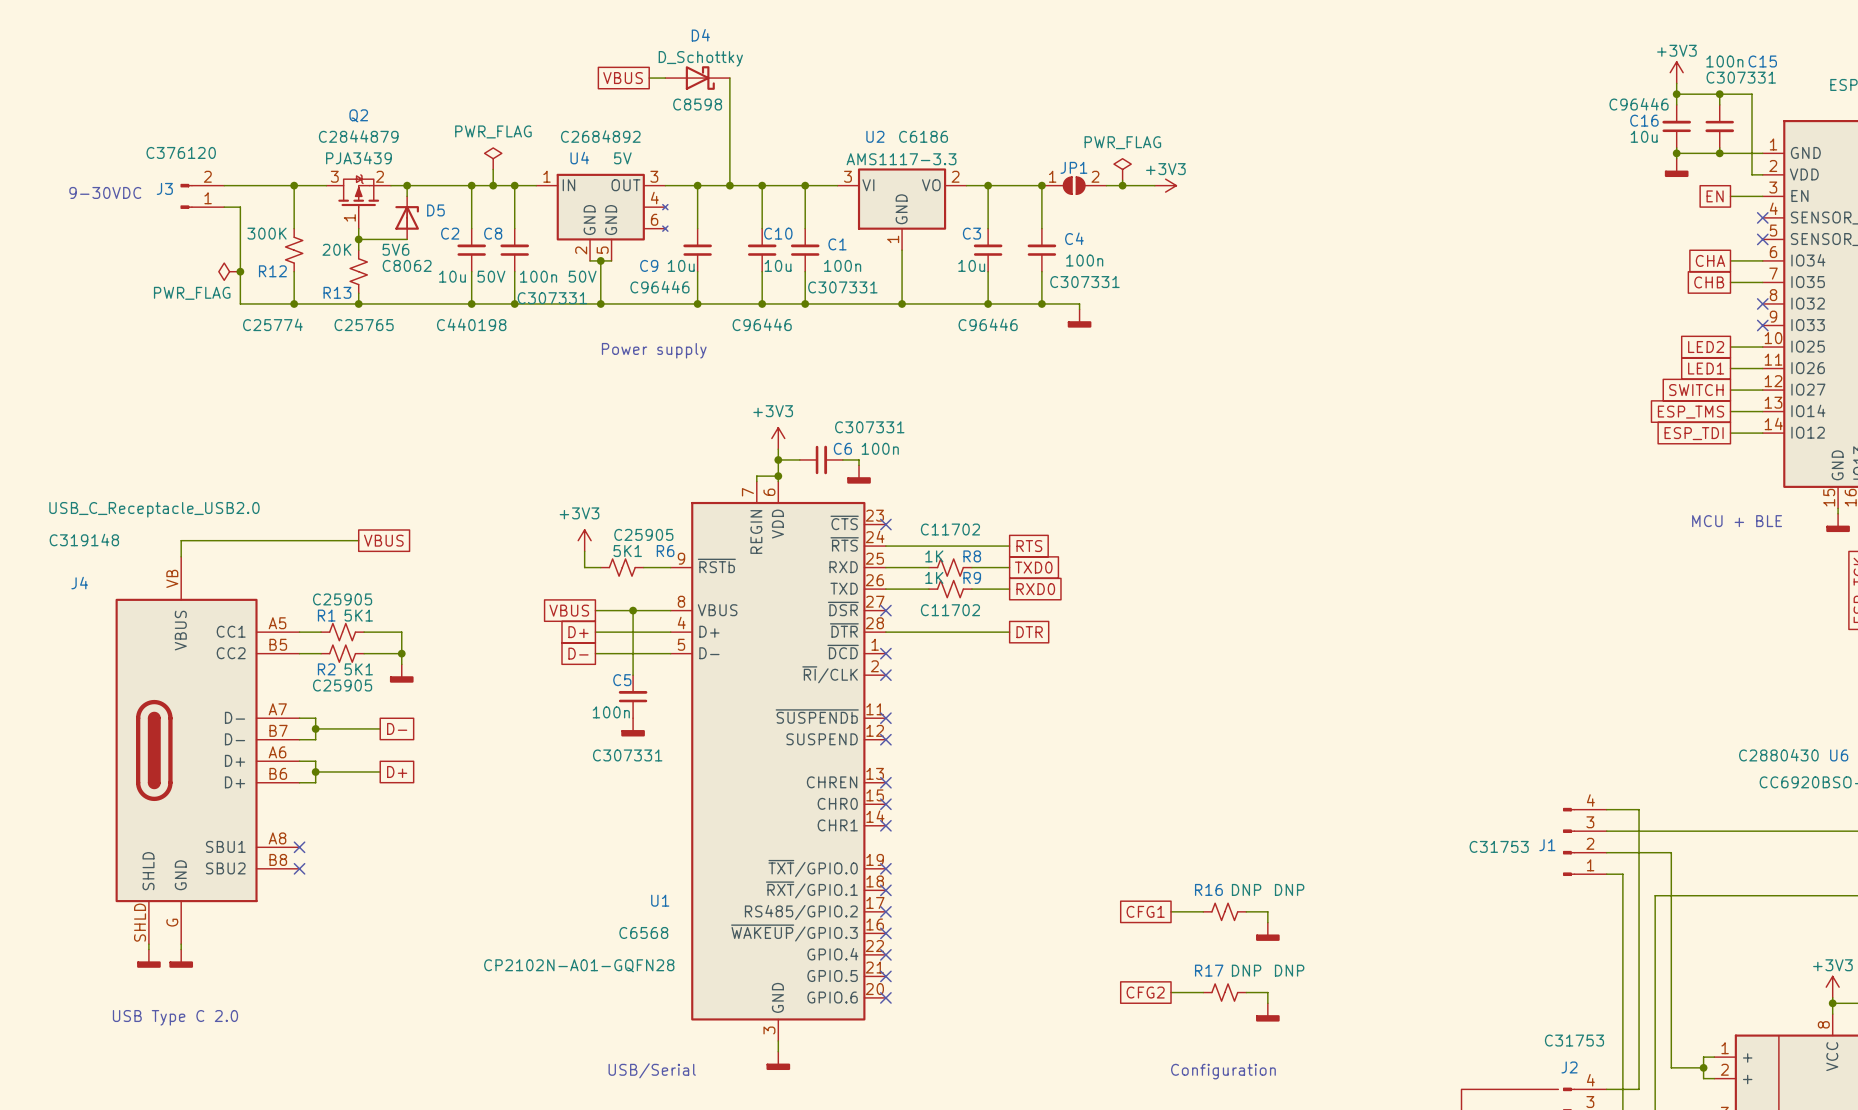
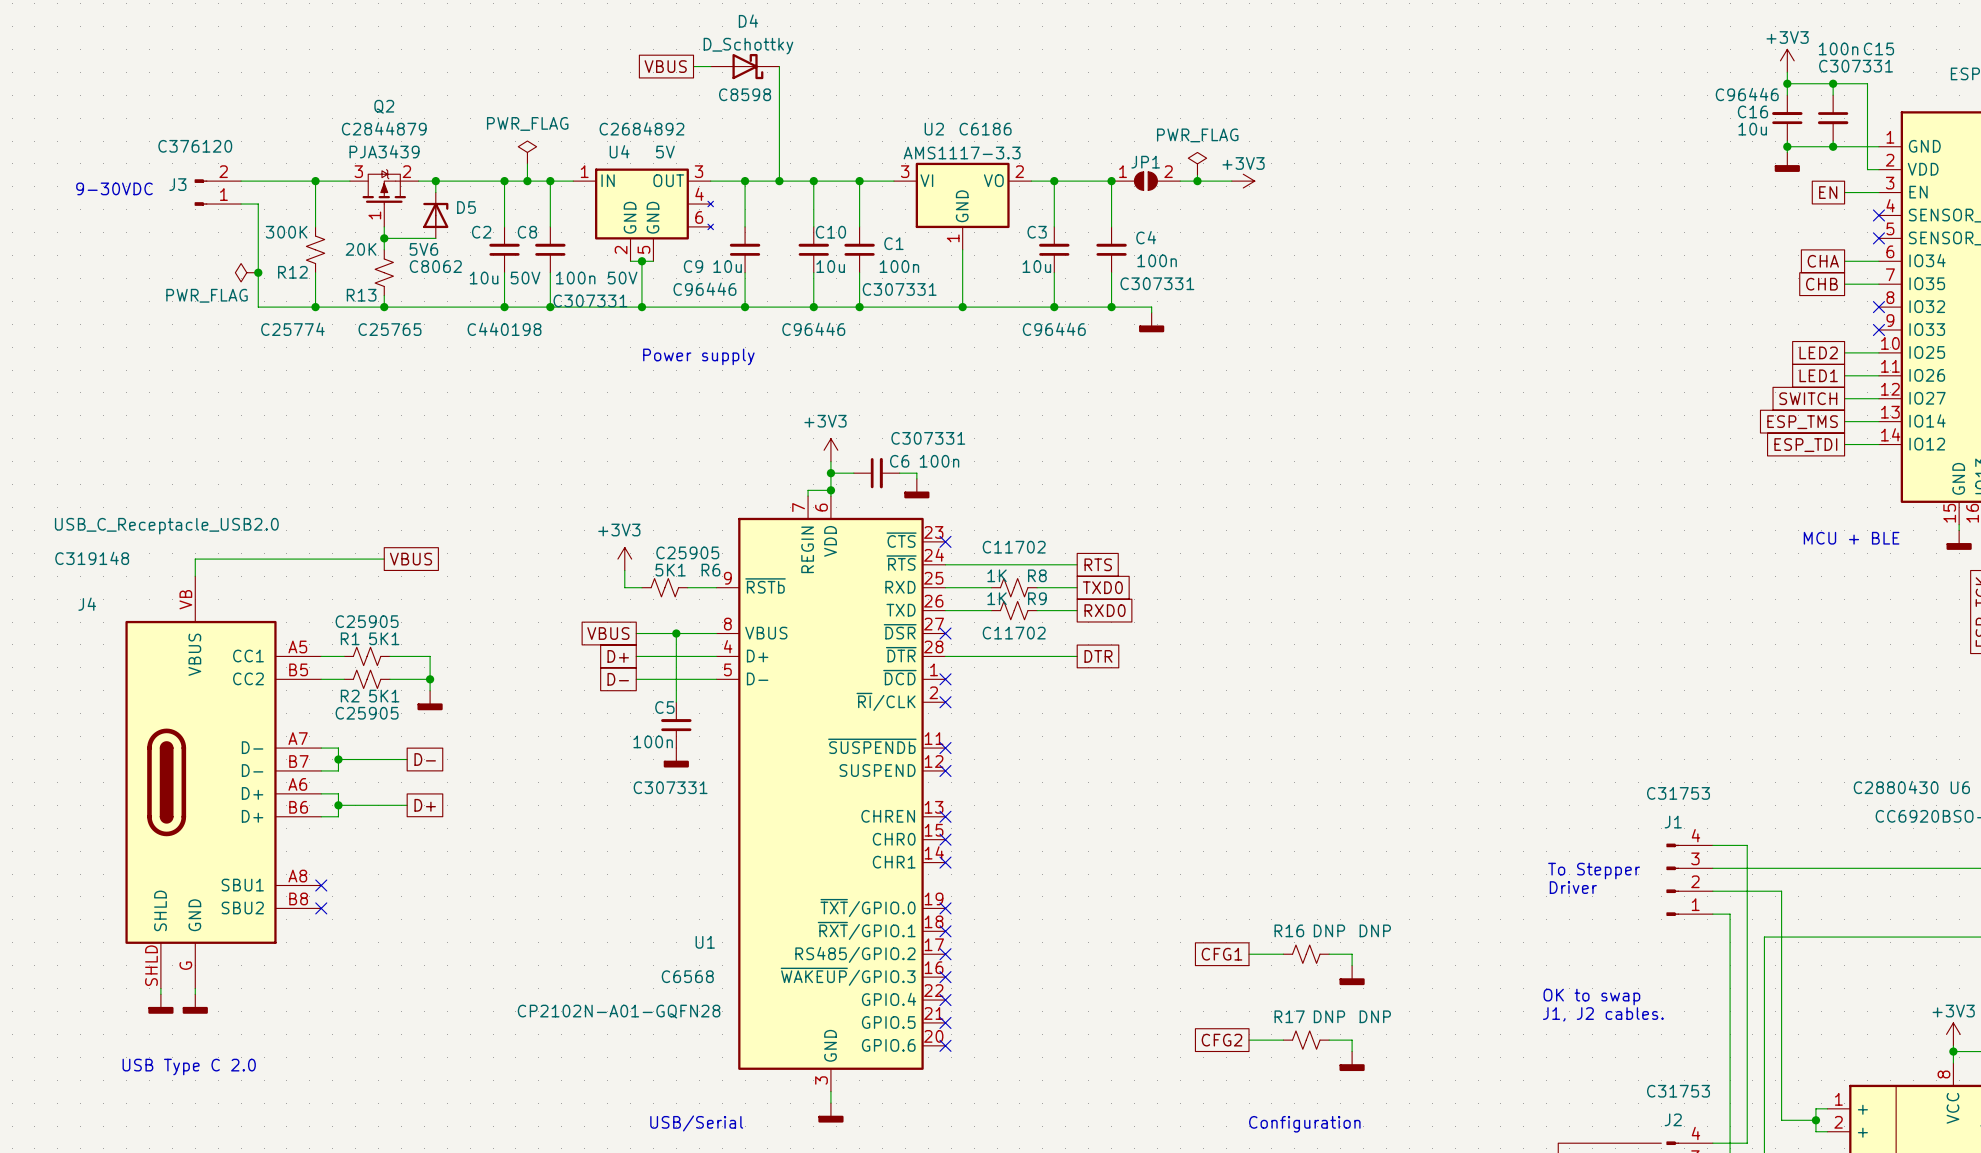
text: none -> To Stepper (1594, 871)
J1 name position: J1 (1547, 845) -> J1 (1673, 822)
J1 text position: C31753 (1499, 846) -> C31753 (1678, 793)
text: none -> Driver (1573, 887)
text: none -> OK to swap (1591, 997)
text: none -> J1, J2 cables. (1603, 1014)

